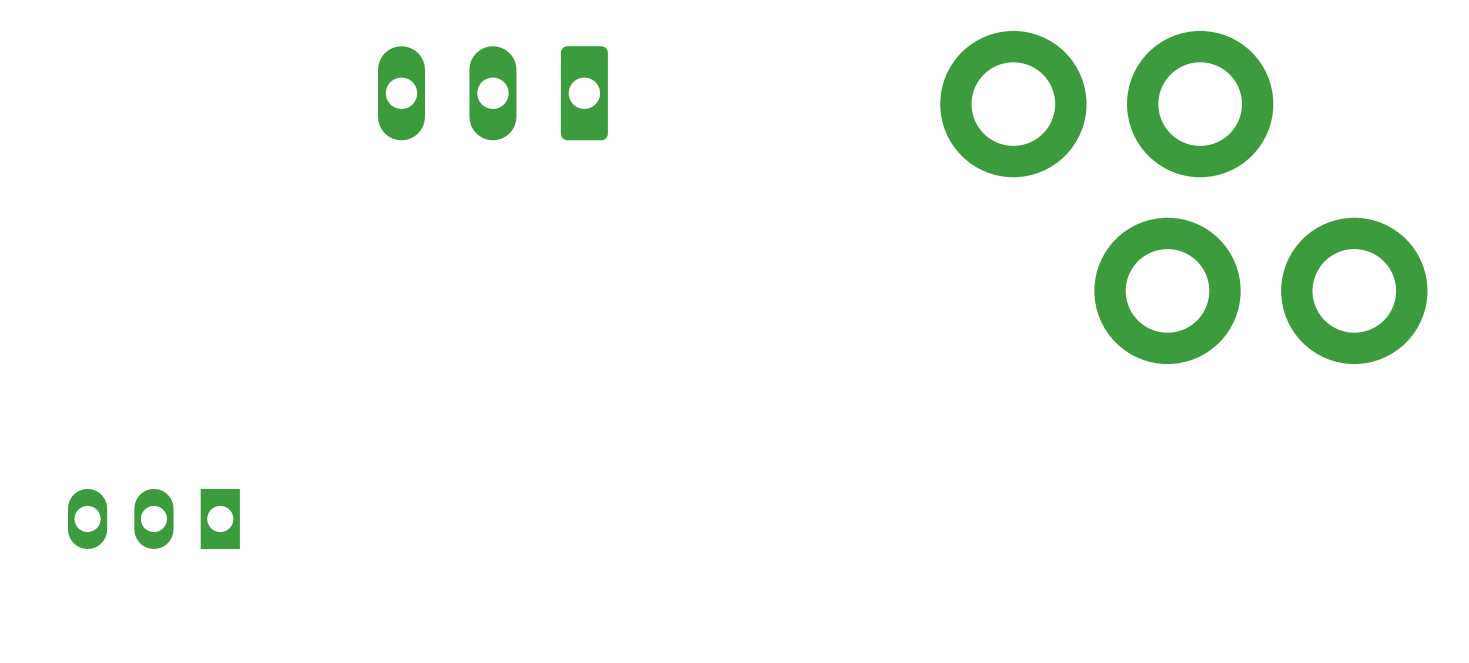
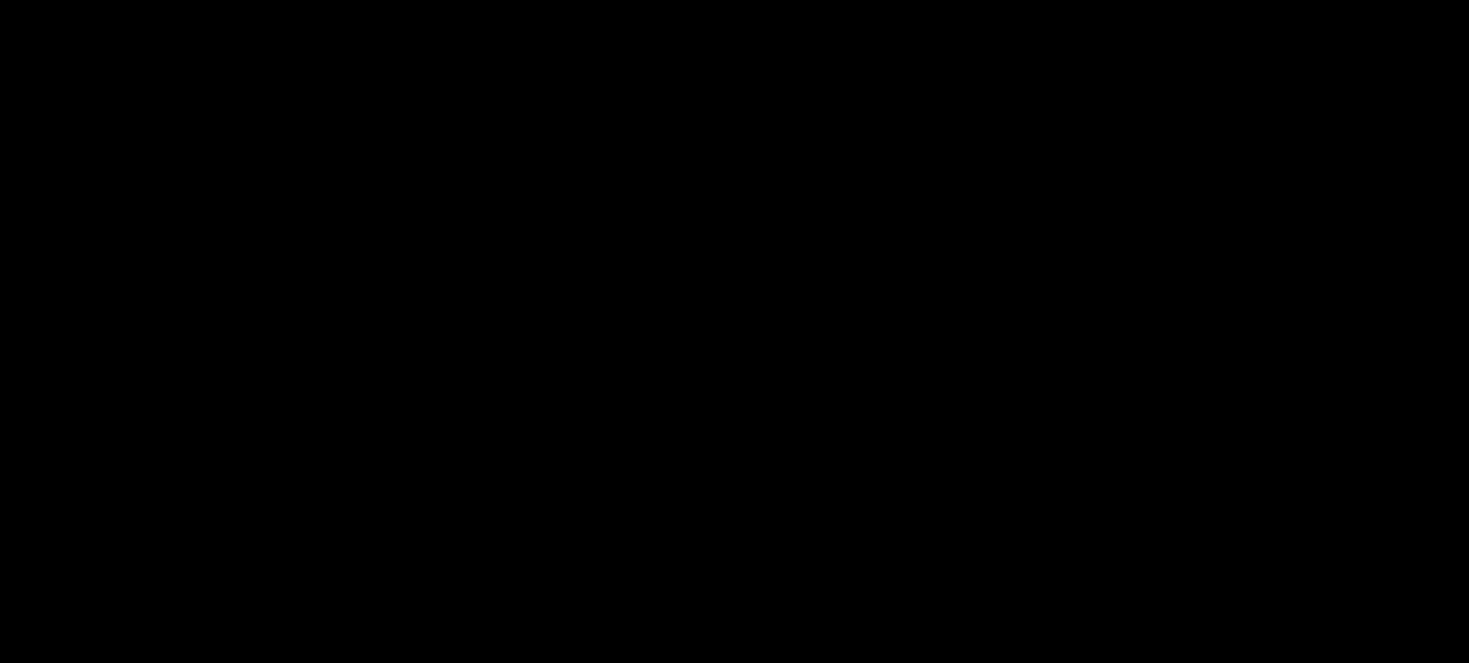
part: (492, 93) -> none
part: (1013, 104) -> none
part: (1200, 104) -> none
part: (1167, 290) -> none
part: (1354, 290) -> none
part: (153, 518) -> none

